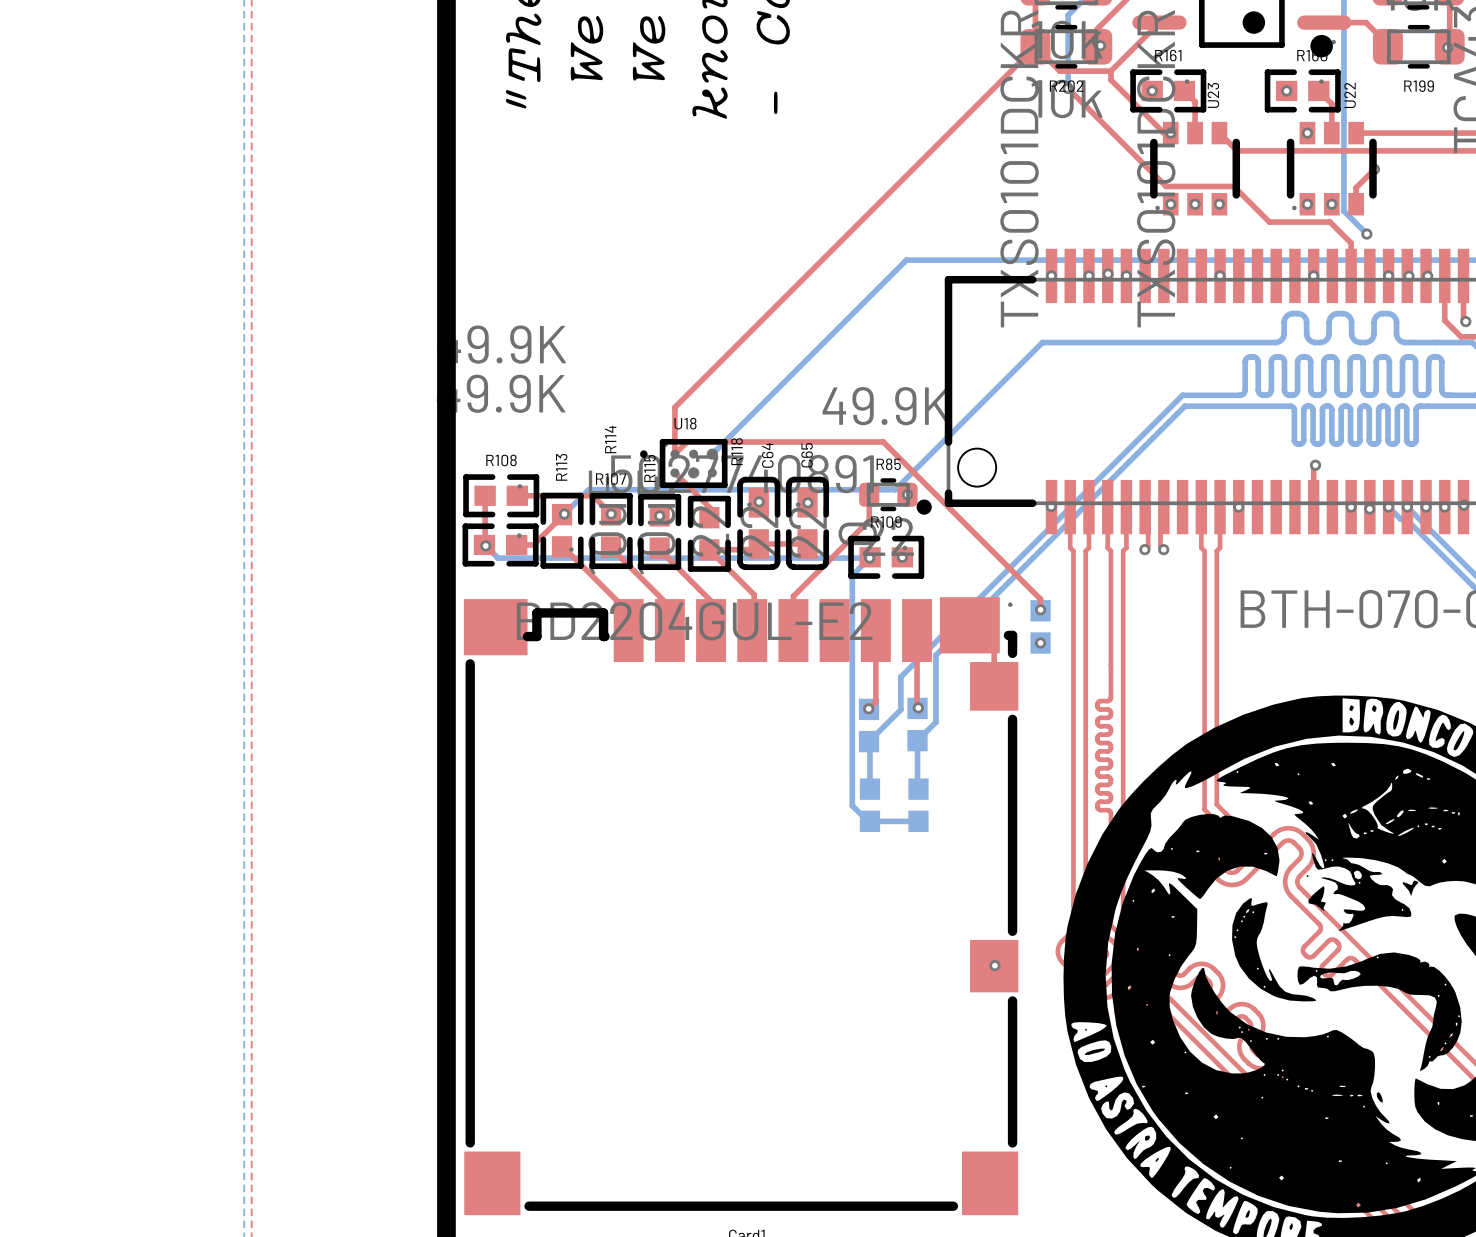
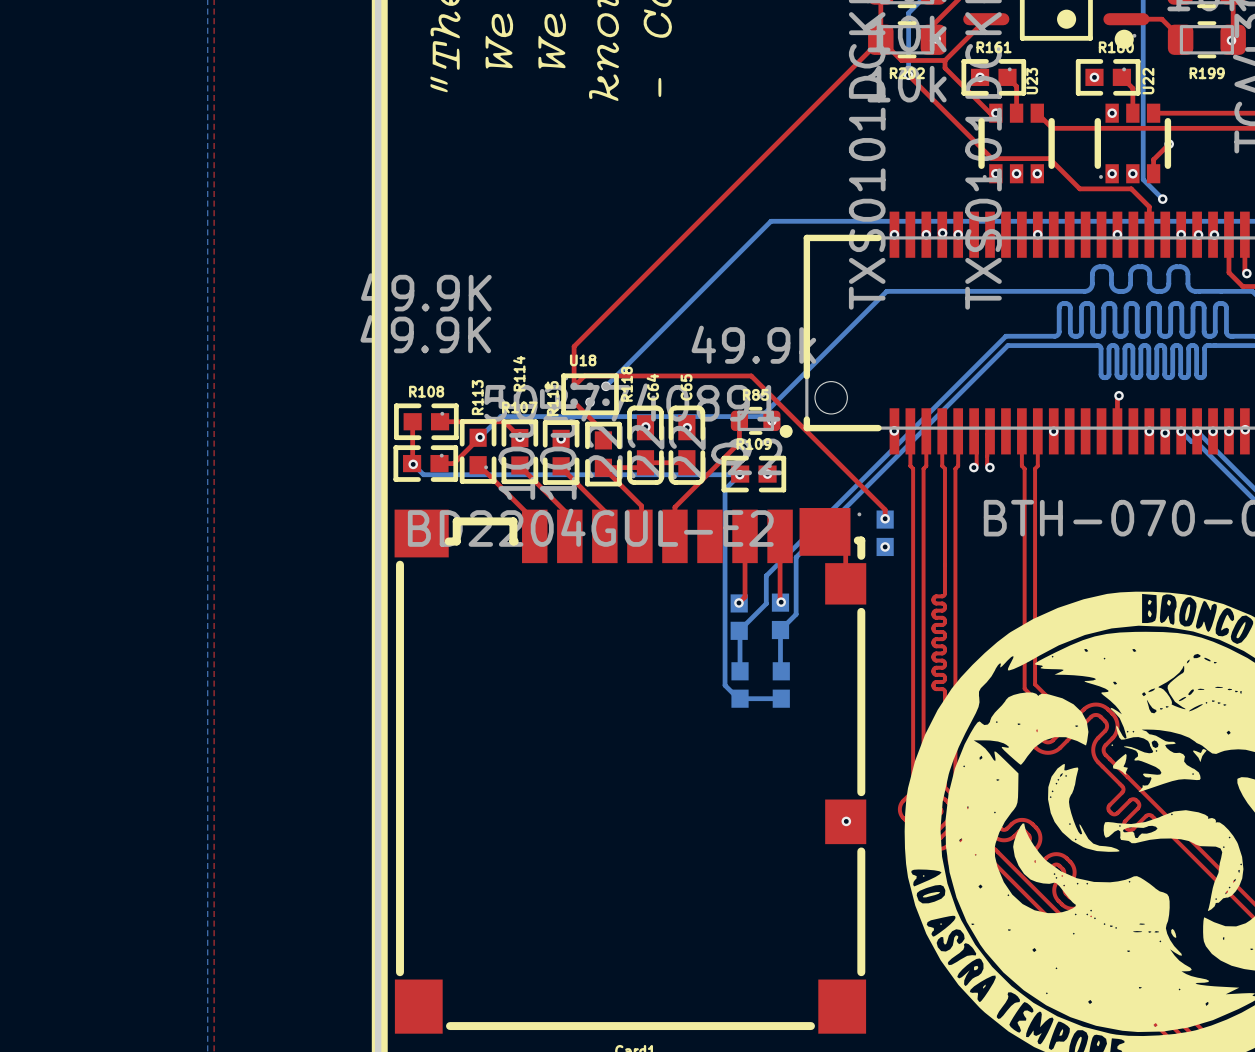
R109 value: 49.9K (886, 406) -> 49.9k (753, 344)

